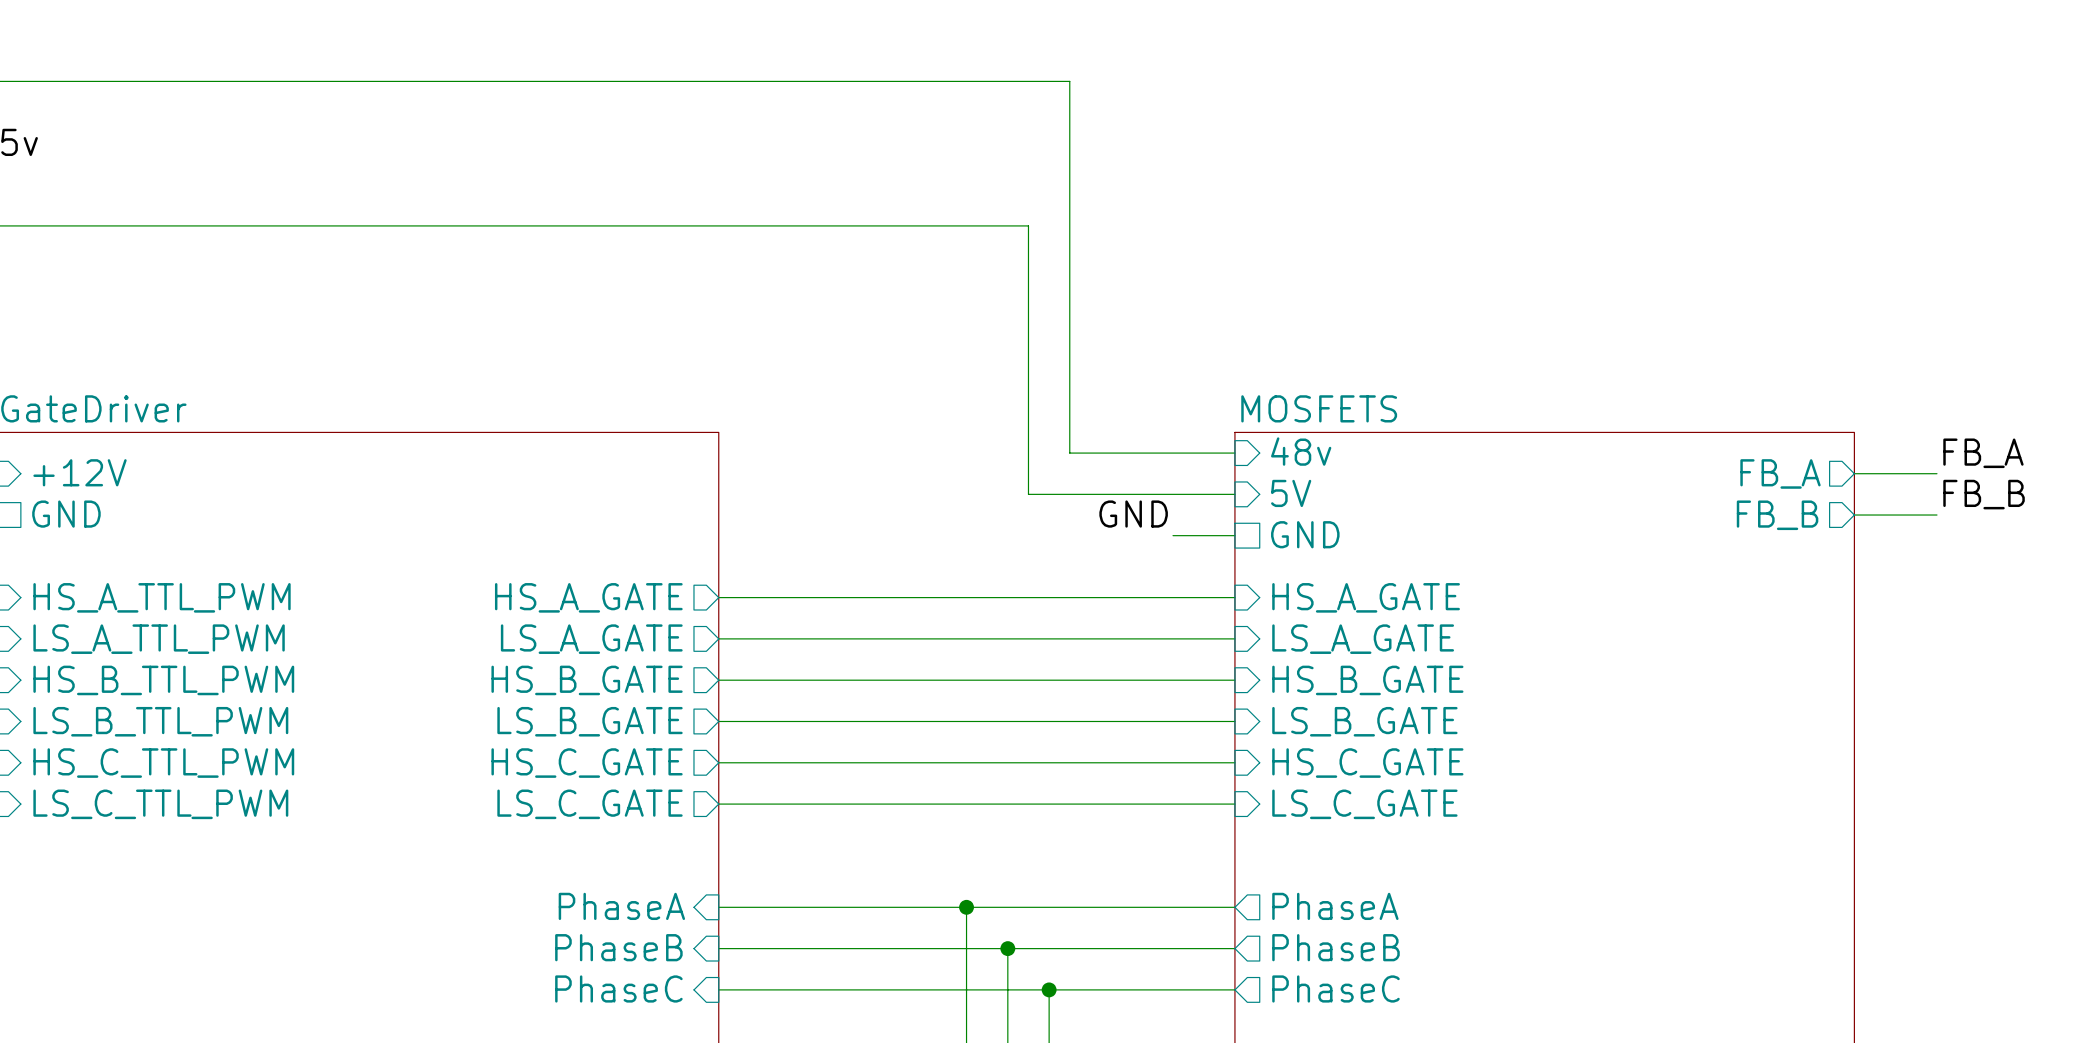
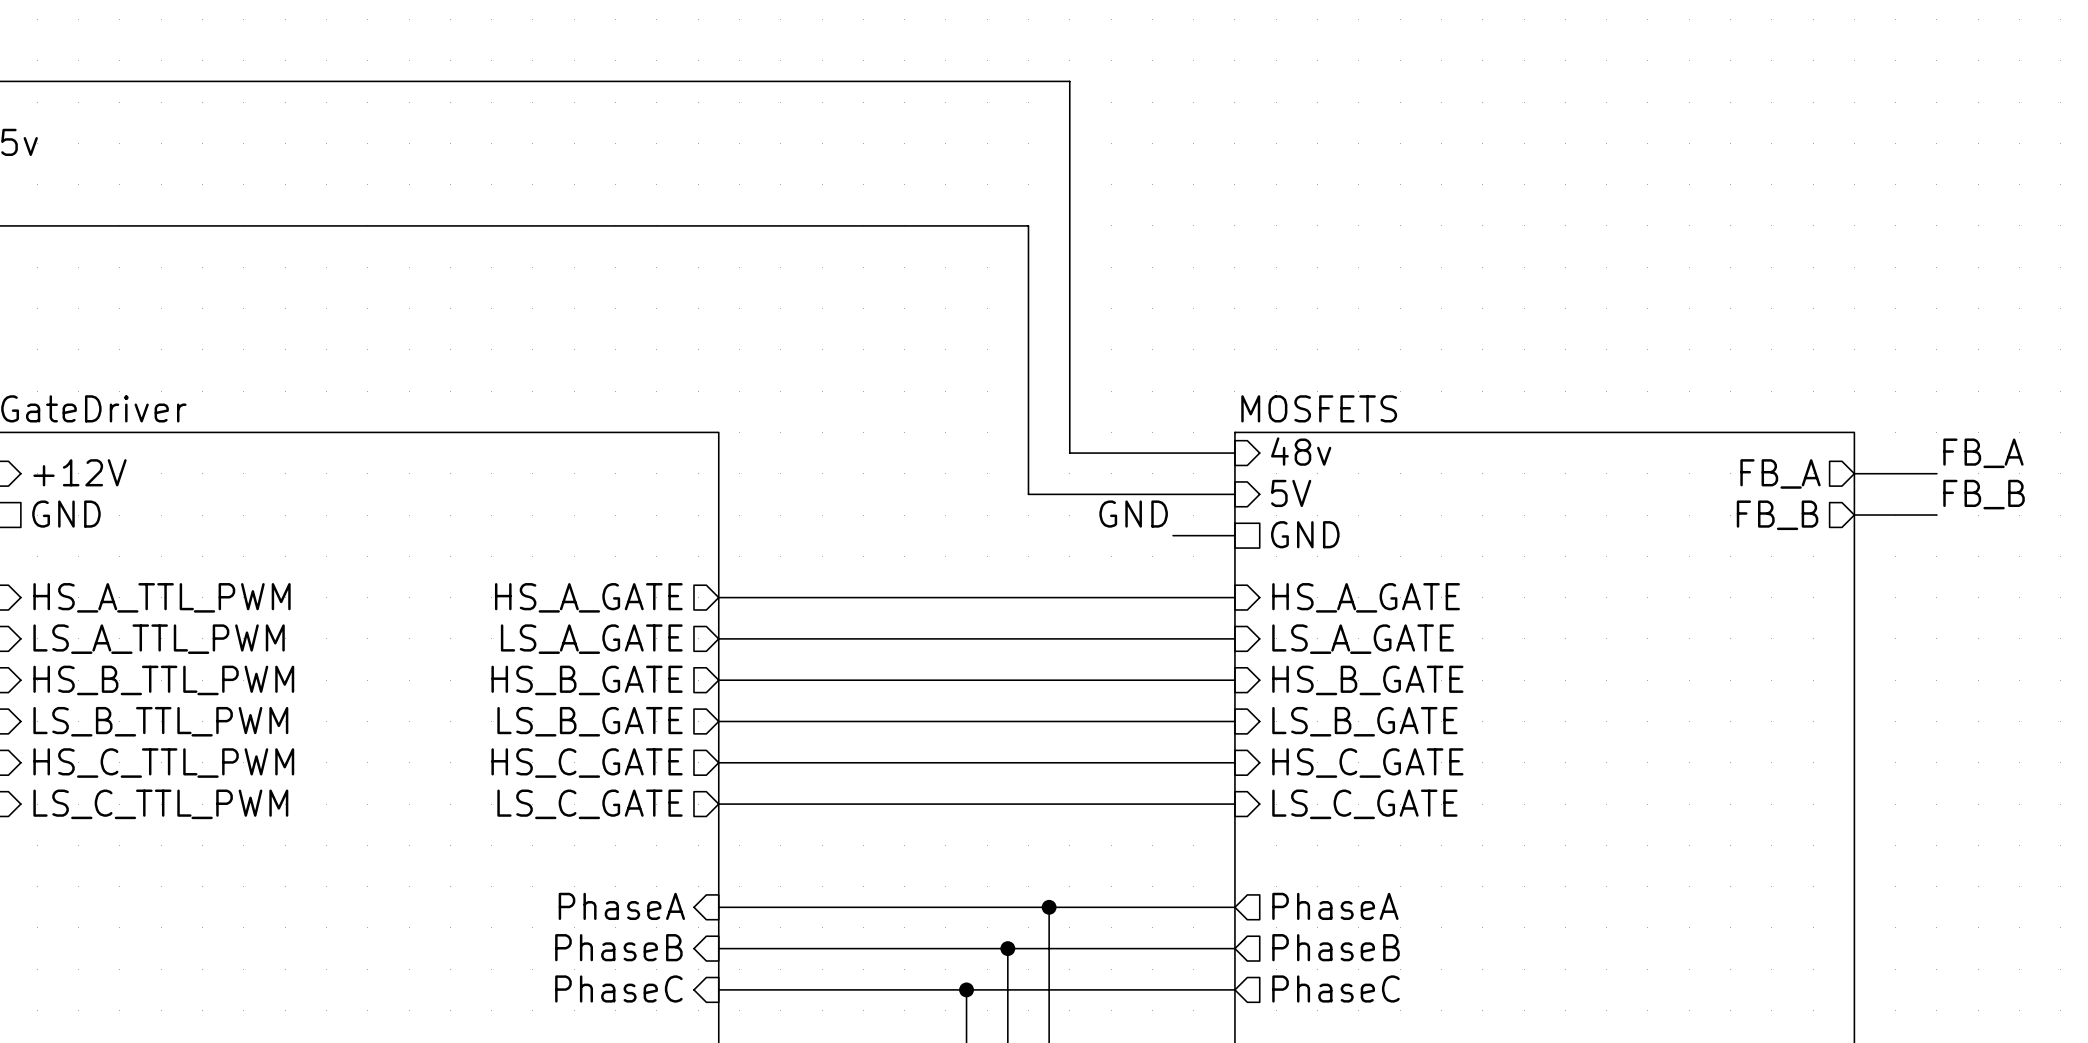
wire: (966, 907) (966, 989) -> (1049, 907) (1049, 989)
junction: (966, 907) -> none
junction: none -> (1049, 907)
junction: none -> (966, 989)
junction: (1049, 989) -> none

